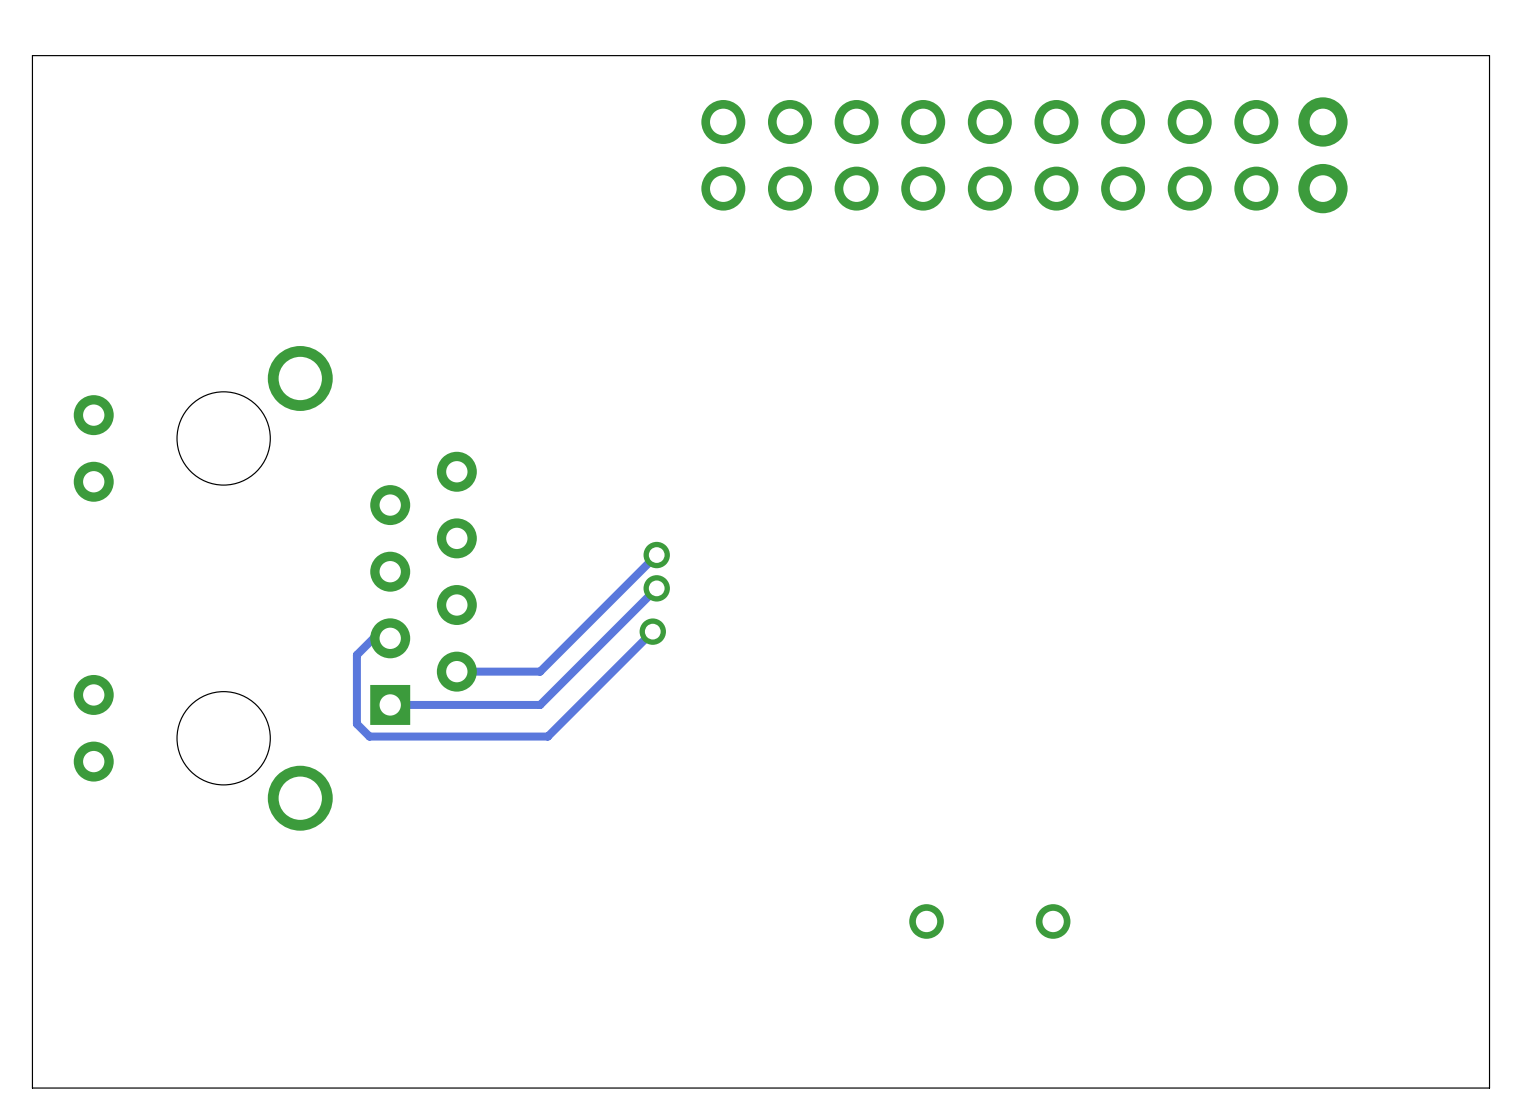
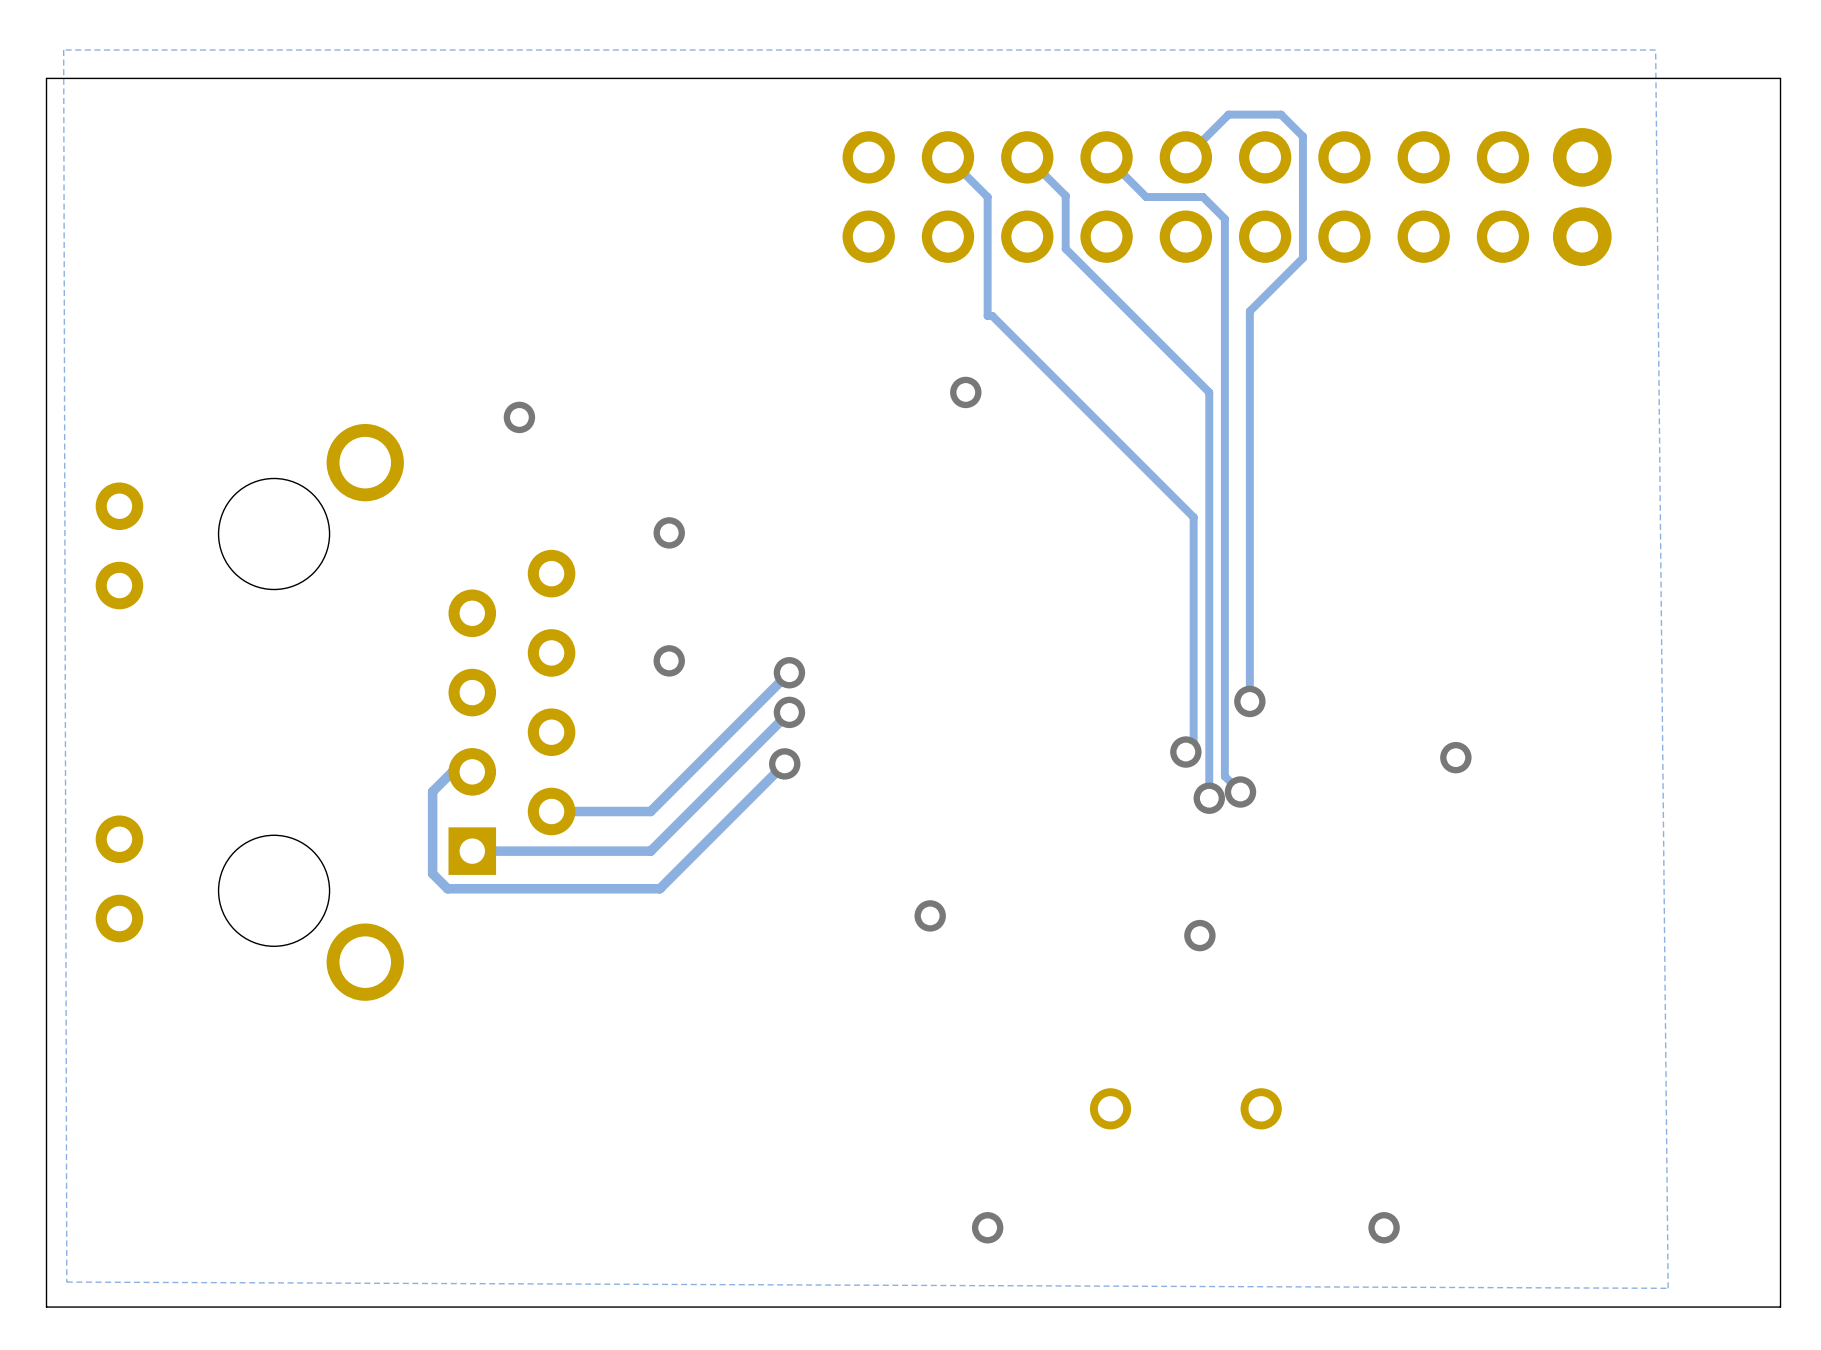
zone outline: none -> (1655, 50) (63, 50) (66, 1282) (1668, 1288) (1655, 50)
track: none -> (948, 157) (987, 197) (987, 315) (992, 315) (1193, 517) (1193, 744) (1185, 752)
track: none -> (1027, 157) (1065, 195) (1065, 248) (1209, 392) (1209, 798)
track: none -> (1106, 157) (1146, 197) (1203, 197) (1224, 218) (1224, 776) (1240, 791)
track: none -> (1185, 157) (1228, 114) (1281, 114) (1302, 136) (1302, 258) (1249, 311) (1249, 701)
via: none -> (965, 392)
via: none -> (519, 417)
via: none -> (669, 532)
via: none -> (669, 660)
via: none -> (1249, 701)
via: none -> (1185, 752)
via: none -> (1455, 757)
via: none -> (1240, 791)
via: none -> (1209, 798)
via: none -> (930, 915)
via: none -> (1199, 935)
via: none -> (987, 1227)
via: none -> (1384, 1227)

